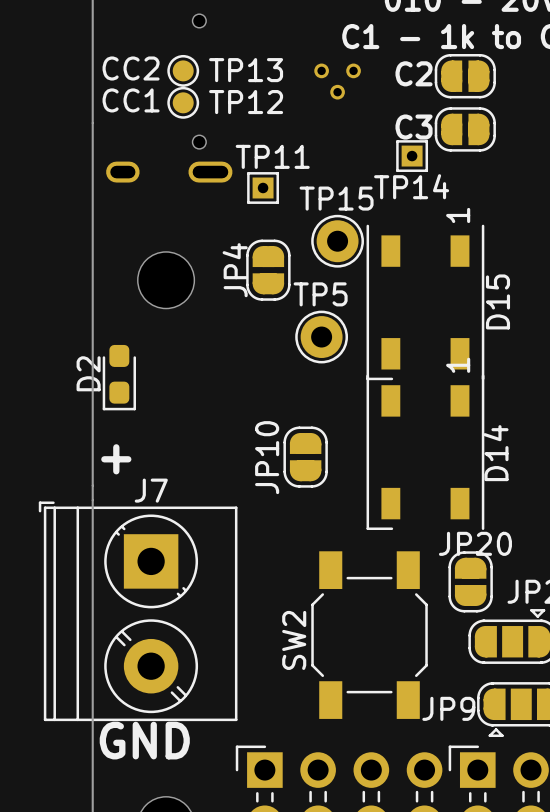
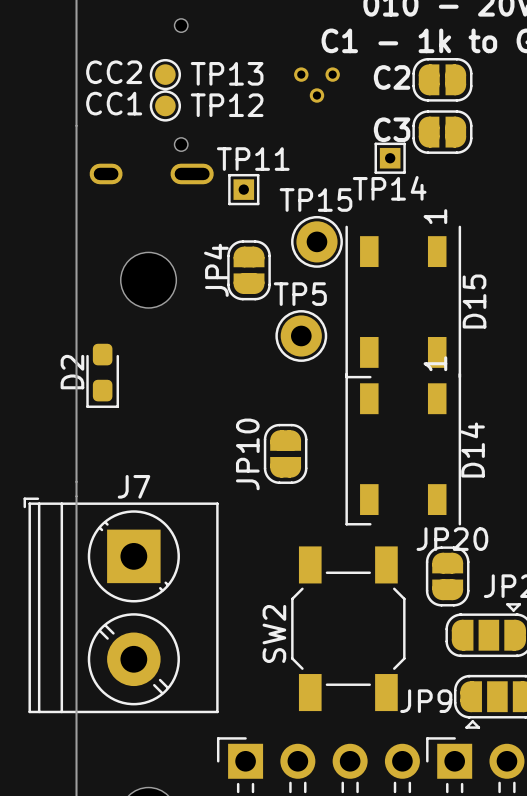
text: + (116, 459) -> none
text: GND (144, 740) -> none

